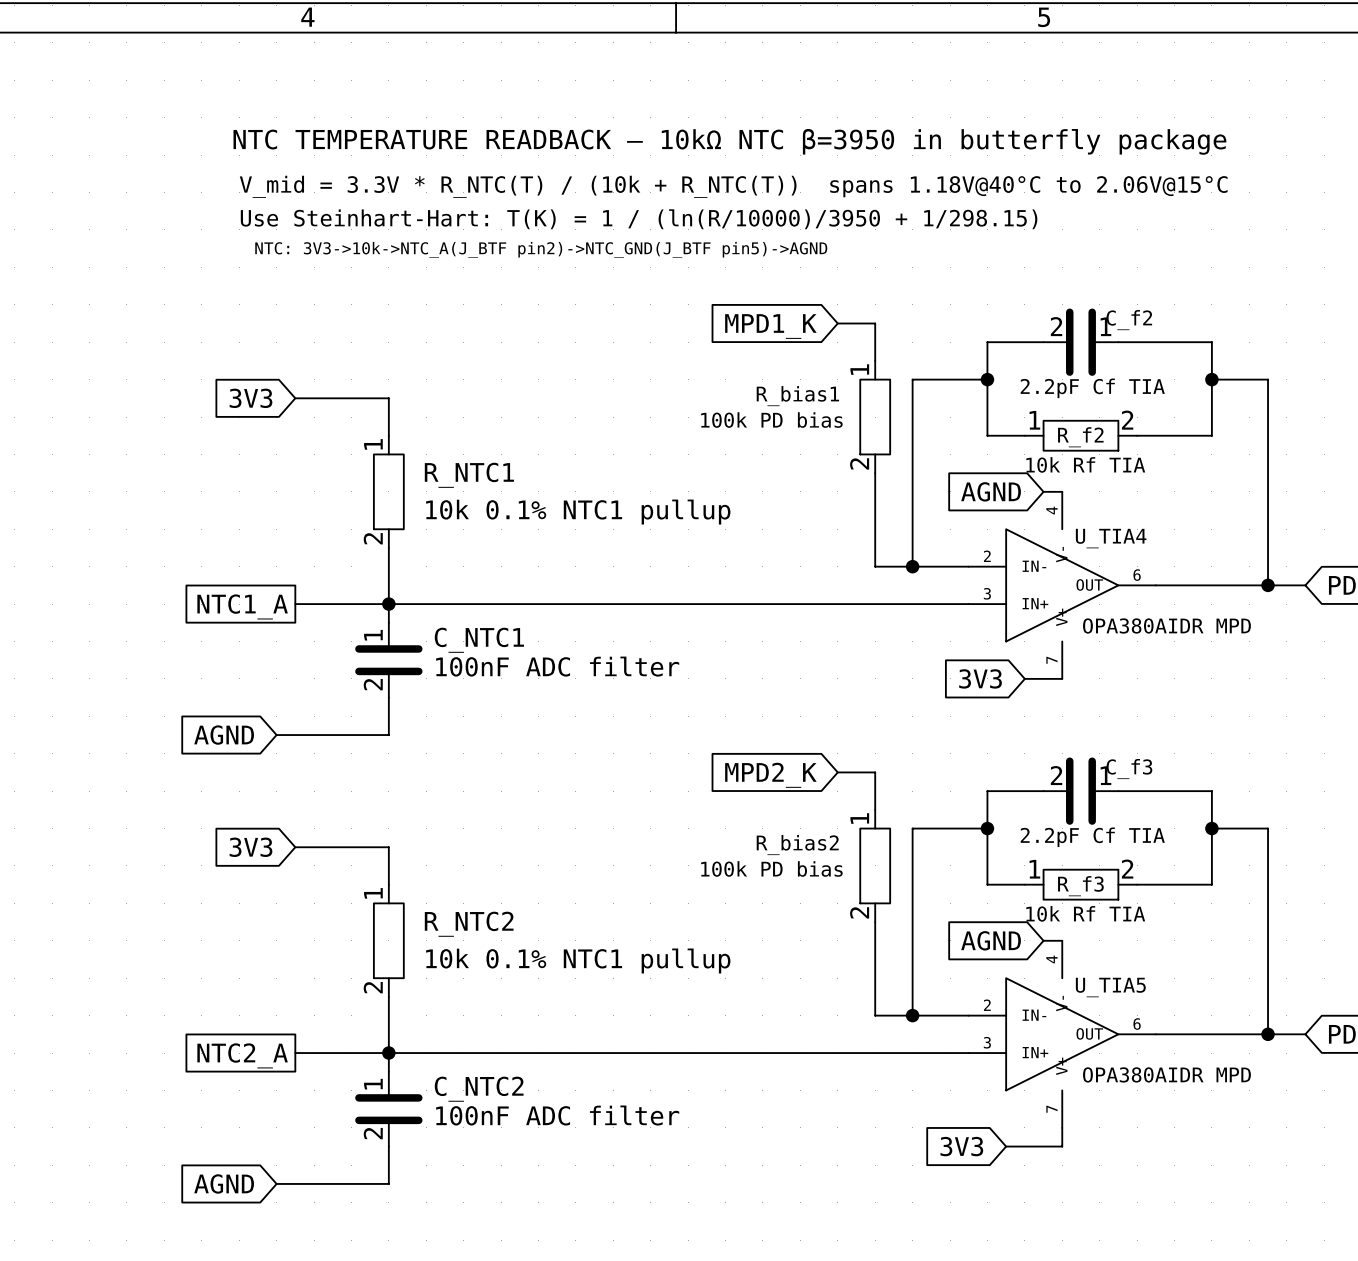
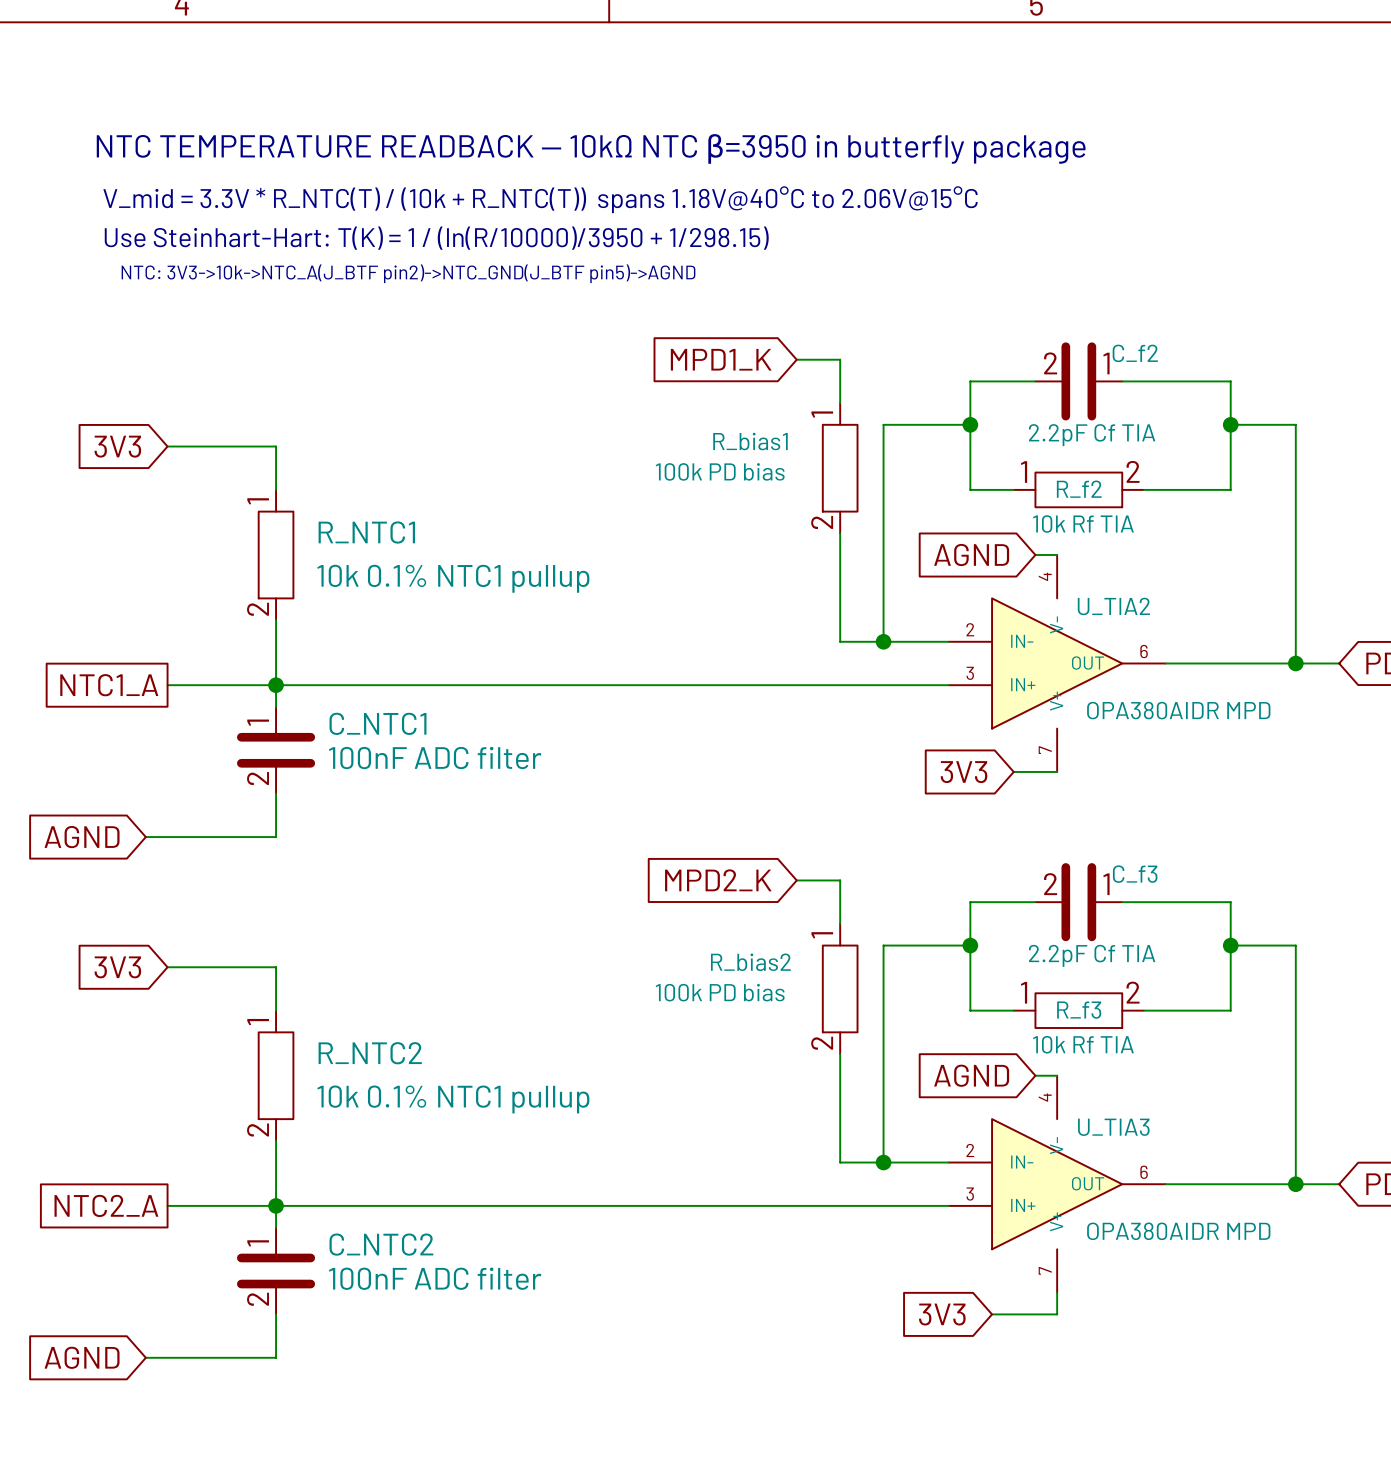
U_TIA4 name: U_TIA4 (1111, 538) -> U_TIA2 (1113, 606)
U_TIA5 name: U_TIA5 (1110, 987) -> U_TIA3 (1113, 1127)

